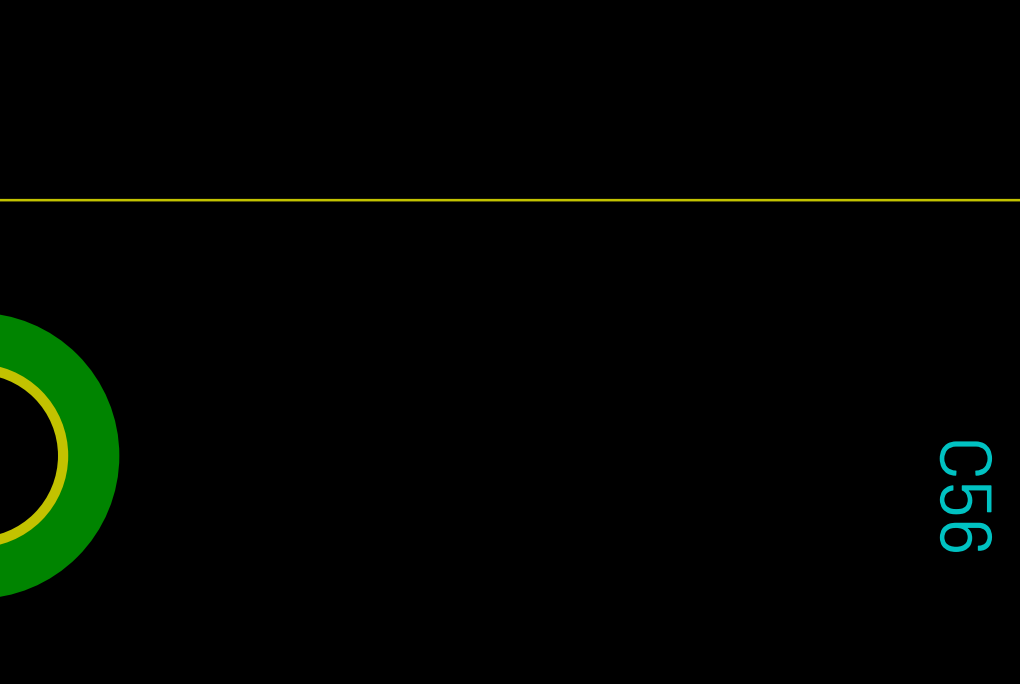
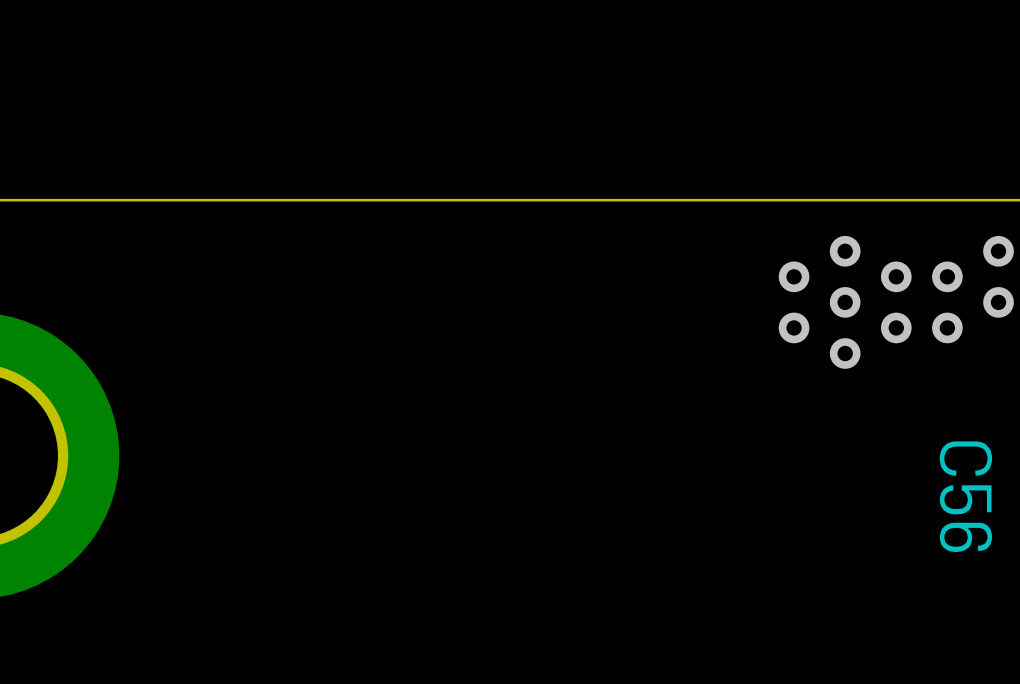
via: none -> (845, 251)
via: none -> (998, 251)
via: none -> (794, 276)
via: none -> (896, 276)
via: none -> (947, 276)
via: none -> (845, 302)
via: none -> (998, 302)
via: none -> (794, 327)
via: none -> (896, 327)
via: none -> (947, 327)
via: none -> (845, 353)

